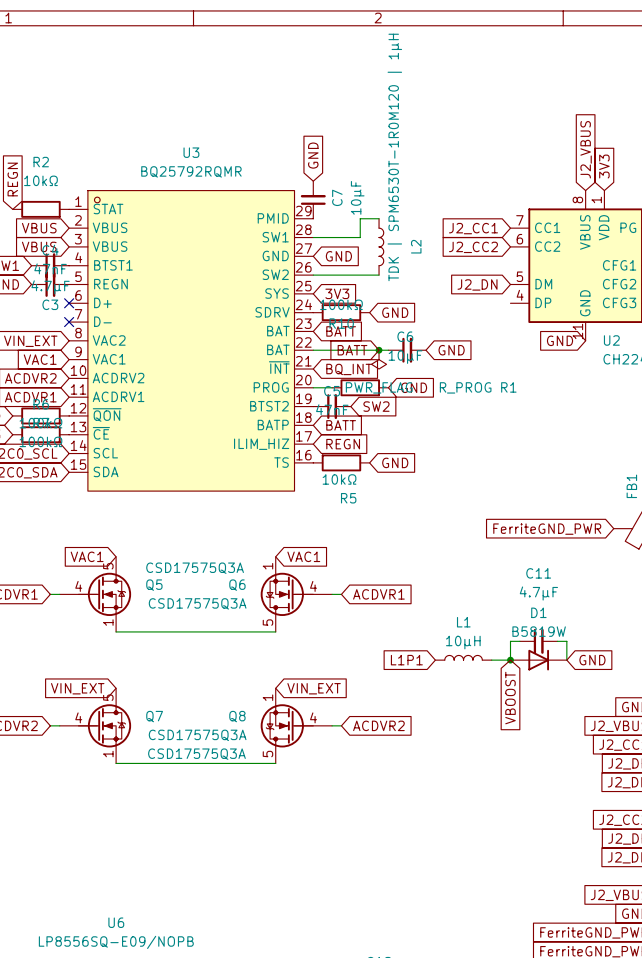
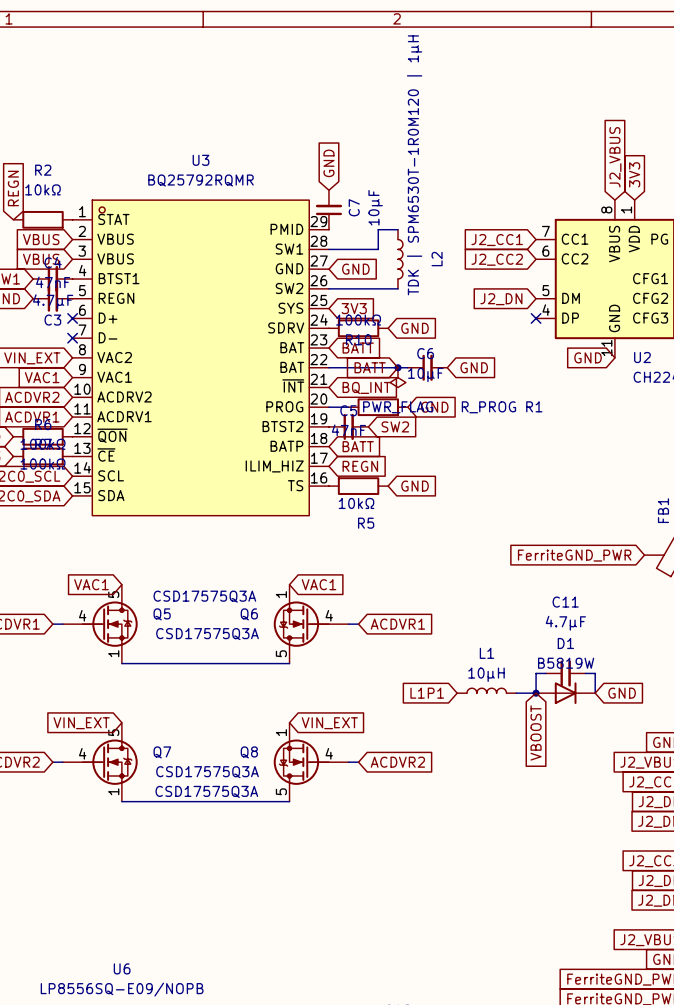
no-connect mark: none -> (536, 318)

